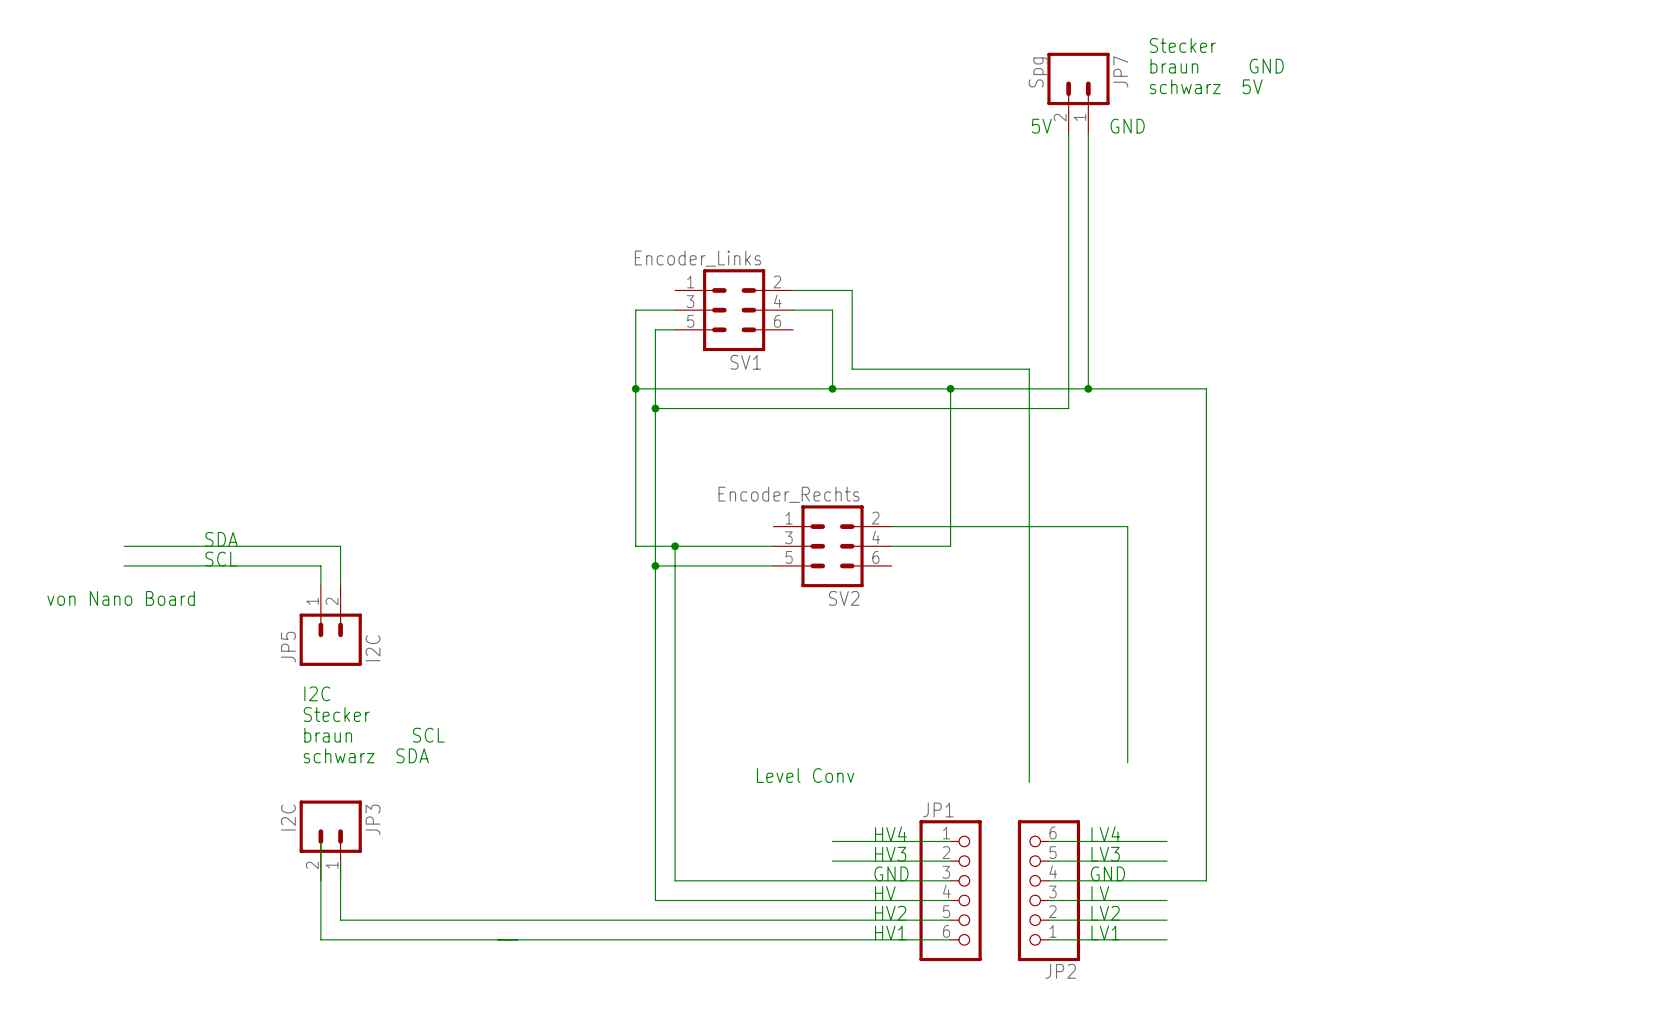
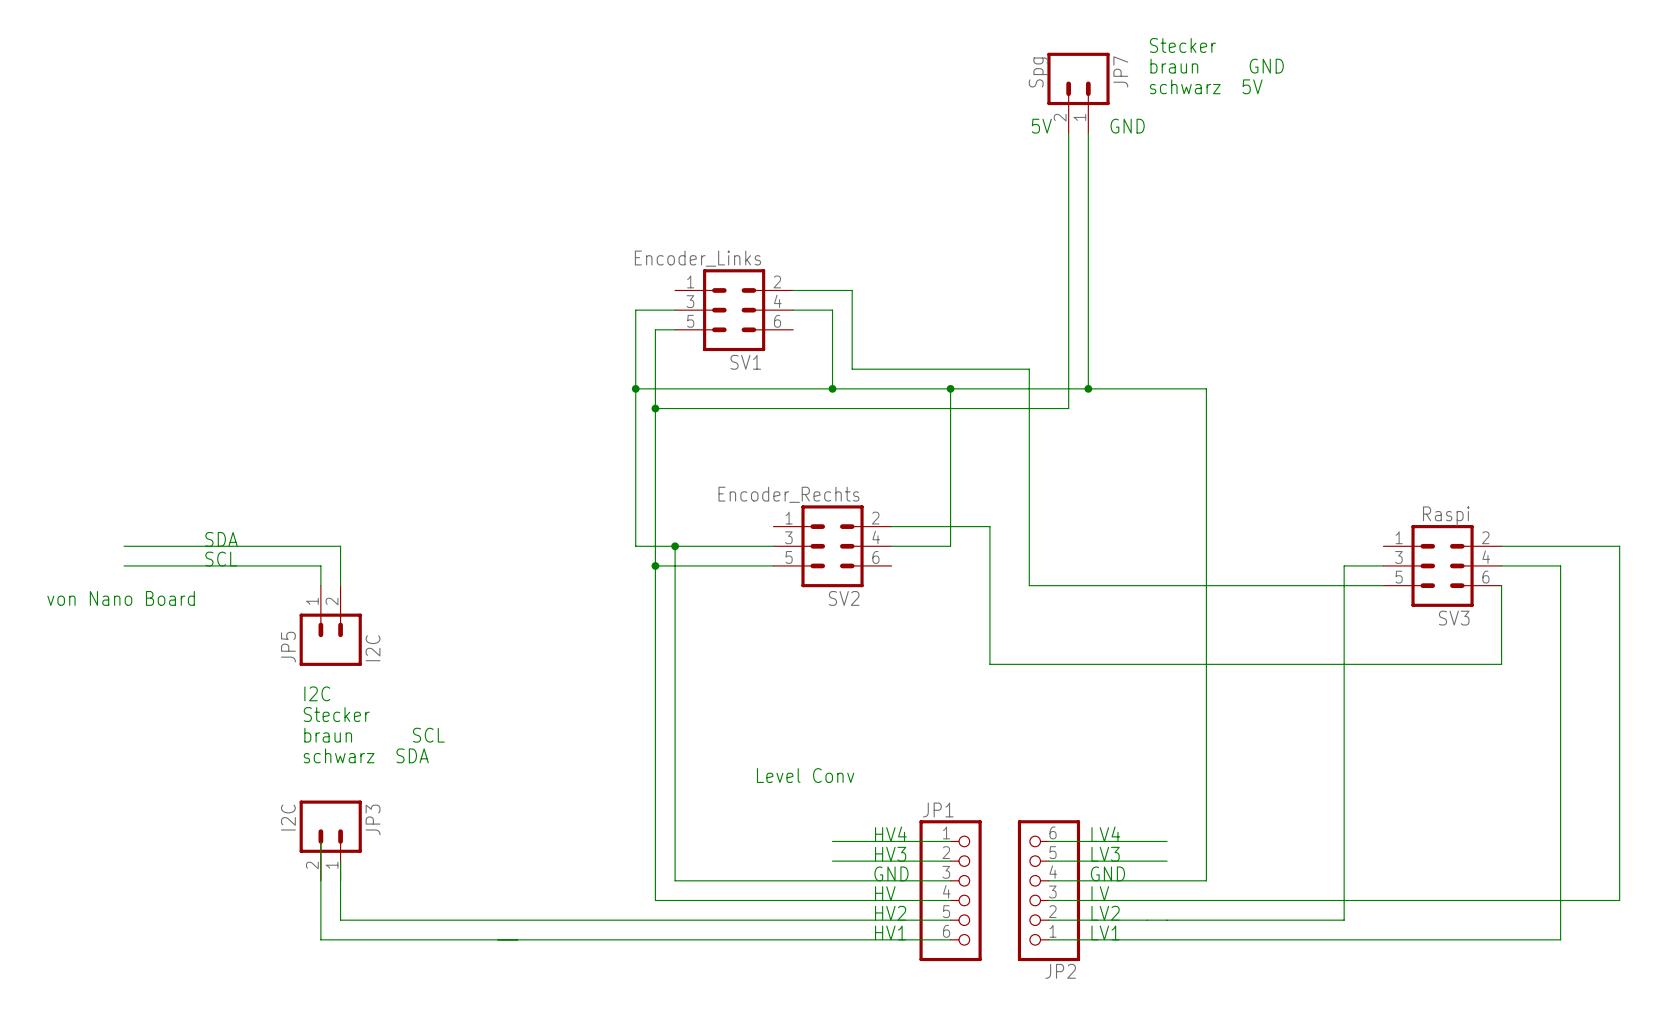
wire: (989, 526) (1127, 526) (1127, 762) -> (989, 526) (989, 664) (1501, 664) (1501, 585)
wire: none -> (1501, 546) (1619, 546) (1619, 900) (1167, 900)
wire: none -> (1383, 565) (1344, 565) (1344, 920) (1167, 920)
SV3: none -> Raspi (1442, 565)
wire: none -> (1501, 565) (1560, 565) (1560, 939) (1167, 939)
wire: (1029, 585) (1029, 782) -> (1029, 585) (1383, 585)

